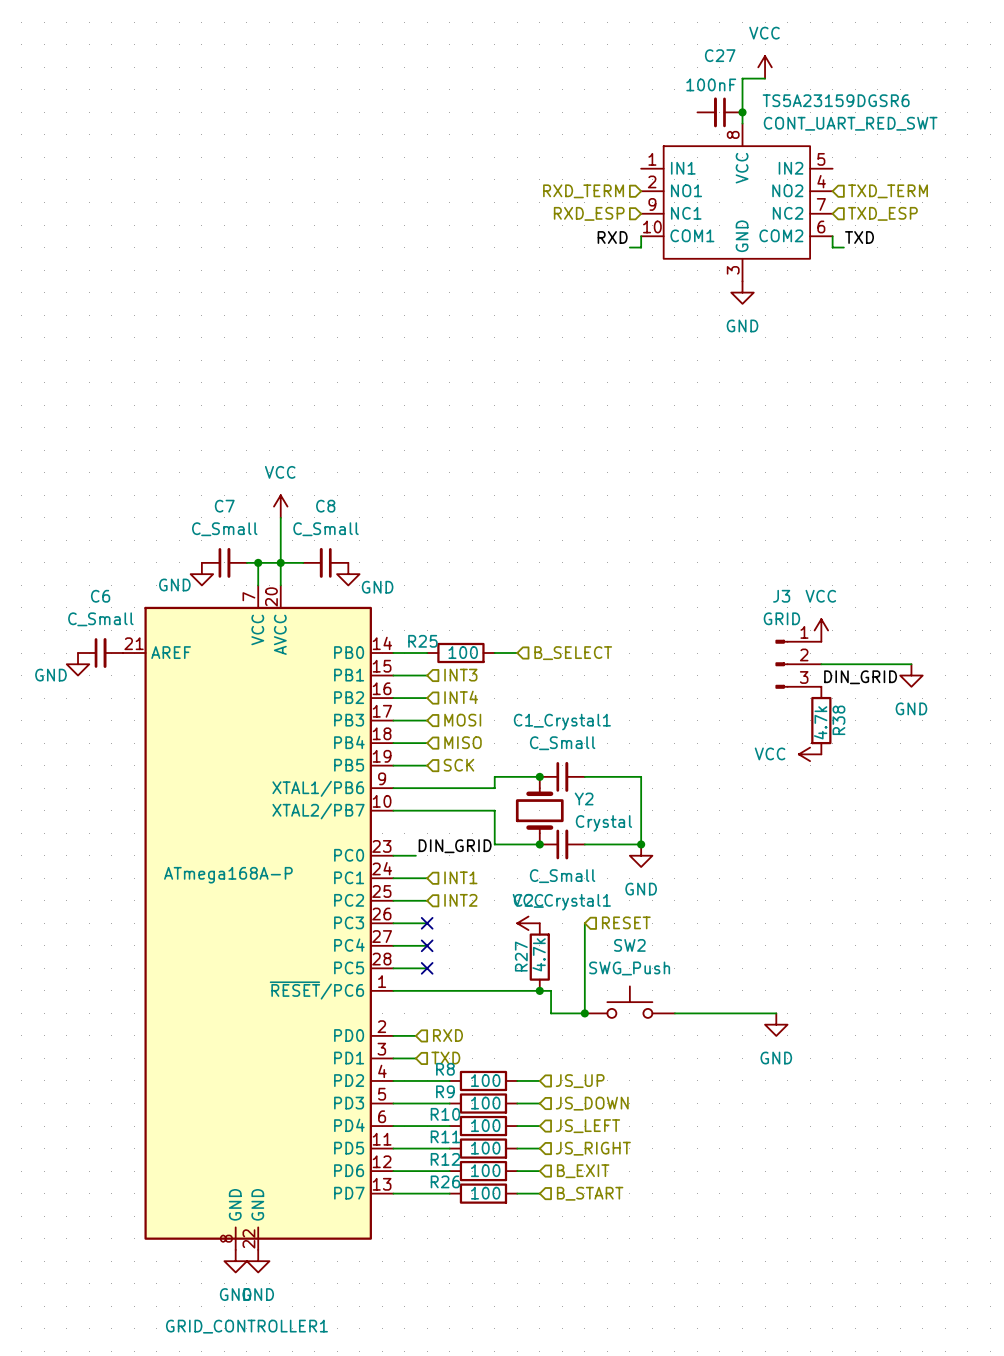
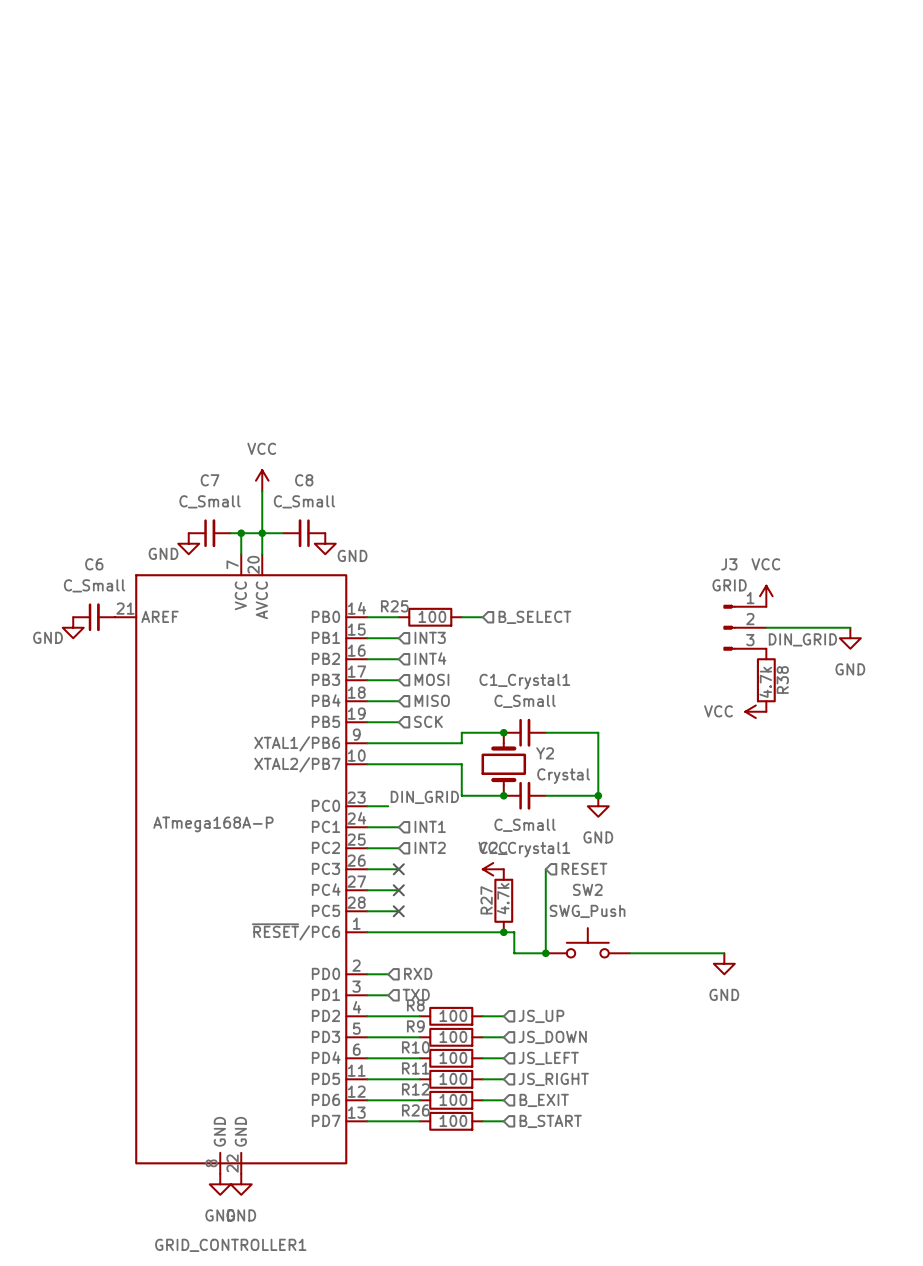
power symbol: VCC (765, 67) -> none
wire: (765, 78) (742, 78) (742, 123) -> none
C27: 100nF (719, 112) -> none
junction: (742, 112) -> none
hierarchical label: RXD_TERM (583, 191) -> none
hierarchical label: TXD_TERM (888, 191) -> none
TS5A23159DGSR6: CONT_UART_RED_SWT (736, 202) -> none
hierarchical label: RXD_ESP (589, 213) -> none
hierarchical label: TXD_ESP (882, 213) -> none
wire: (641, 236) (641, 247) (629, 247) -> none
wire: (832, 236) (832, 247) (843, 247) -> none
label: RXD (612, 237) -> none
label: TXD (859, 237) -> none
power symbol: GND (742, 292) -> none

